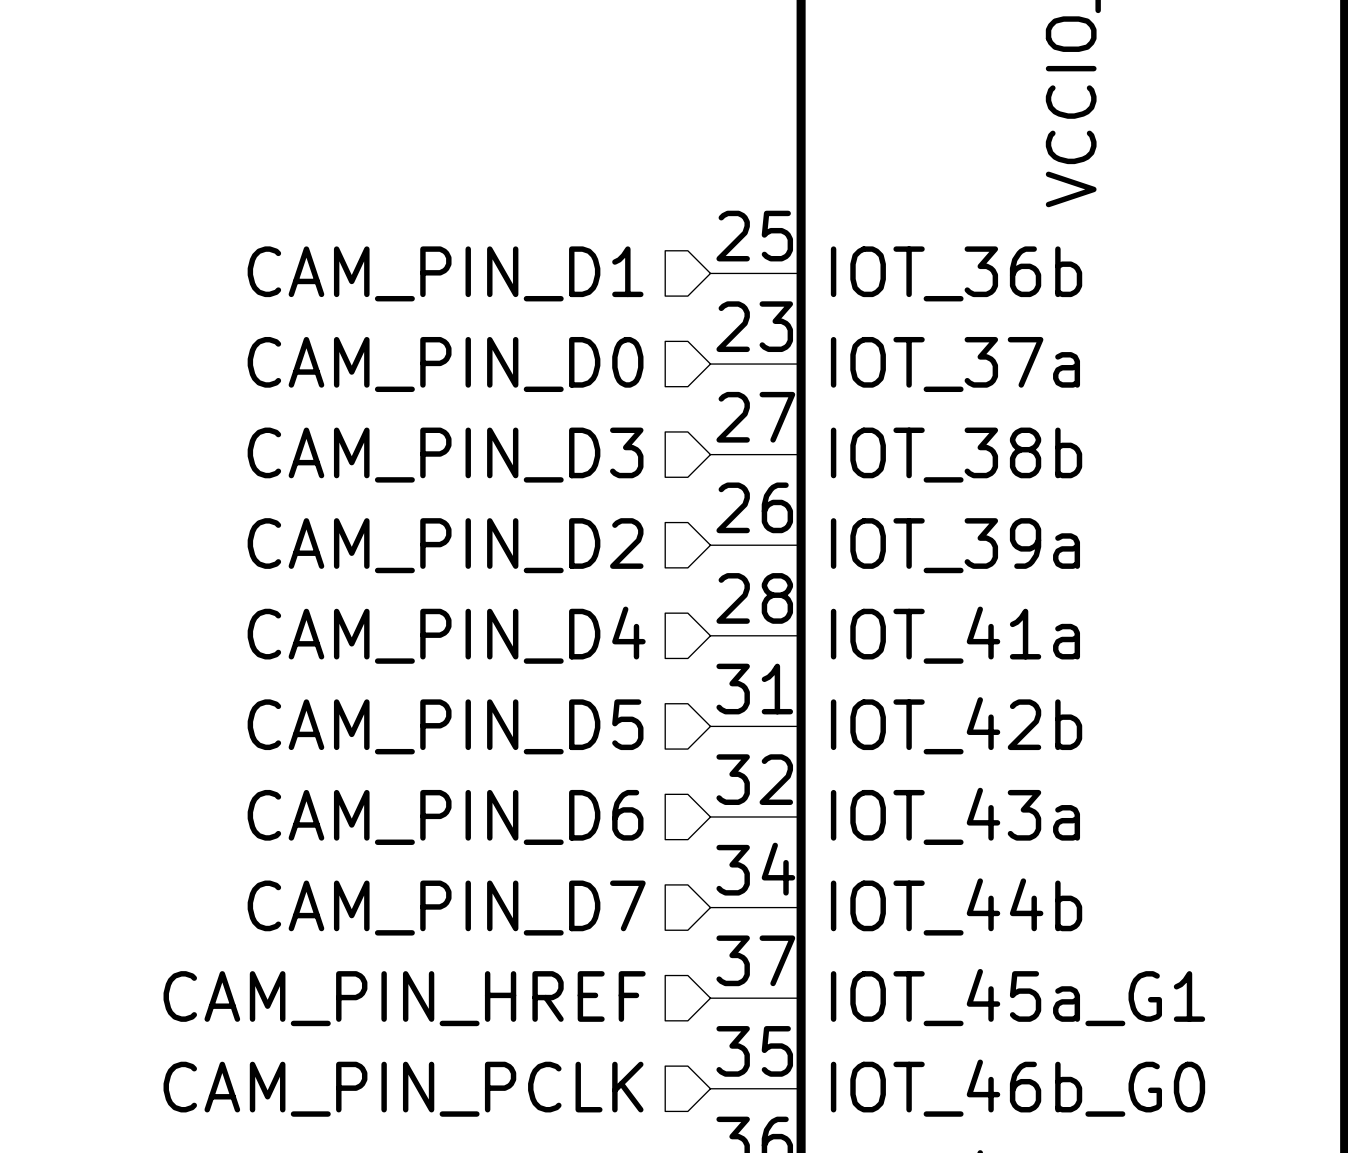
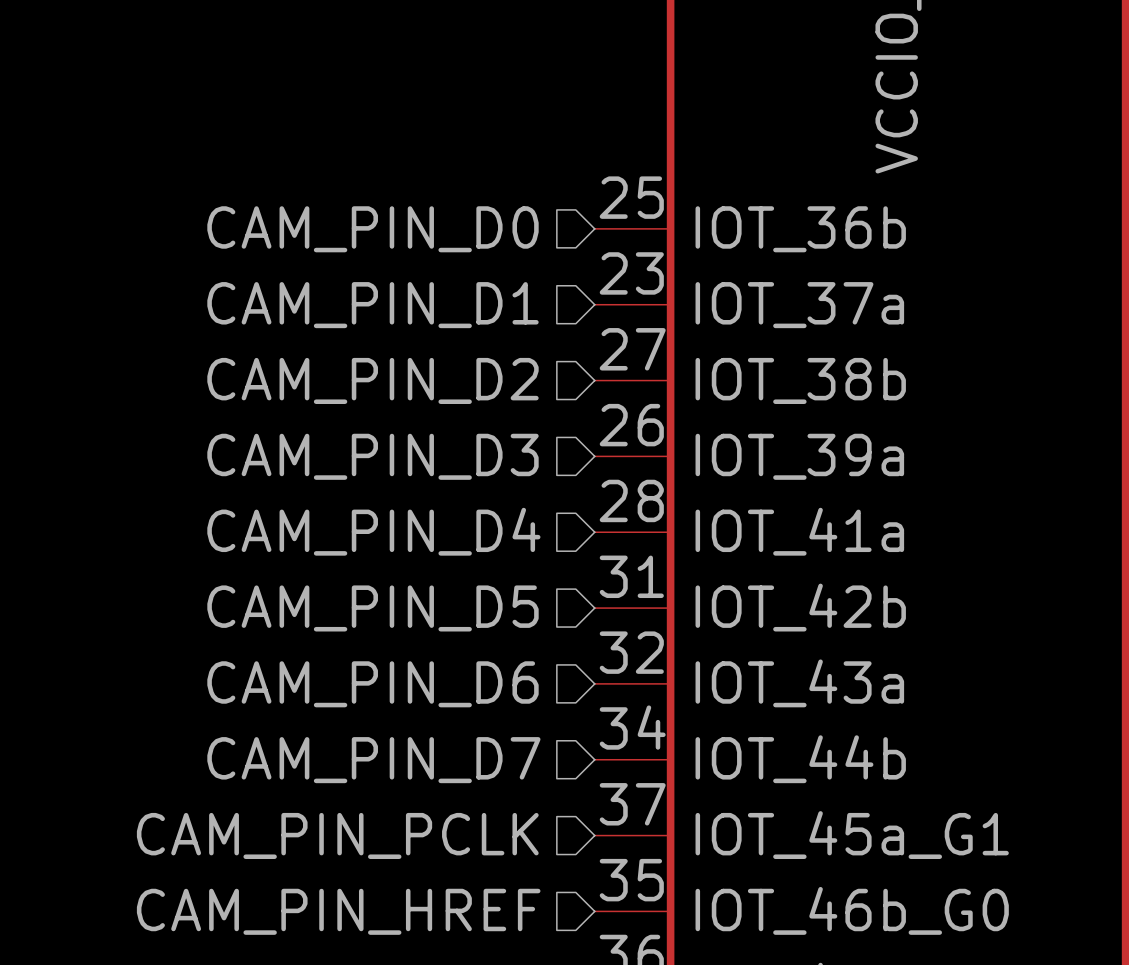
hierarchical label: CAM_PIN_D1 (445, 273) -> CAM_PIN_D0 (372, 229)
hierarchical label: CAM_PIN_D0 (445, 364) -> CAM_PIN_D1 (372, 305)
hierarchical label: CAM_PIN_D3 (445, 455) -> CAM_PIN_D2 (372, 380)
hierarchical label: CAM_PIN_D2 (445, 545) -> CAM_PIN_D3 (372, 456)
hierarchical label: CAM_PIN_HREF (404, 998) -> CAM_PIN_PCLK (337, 835)
hierarchical label: CAM_PIN_PCLK (403, 1089) -> CAM_PIN_HREF (338, 911)

